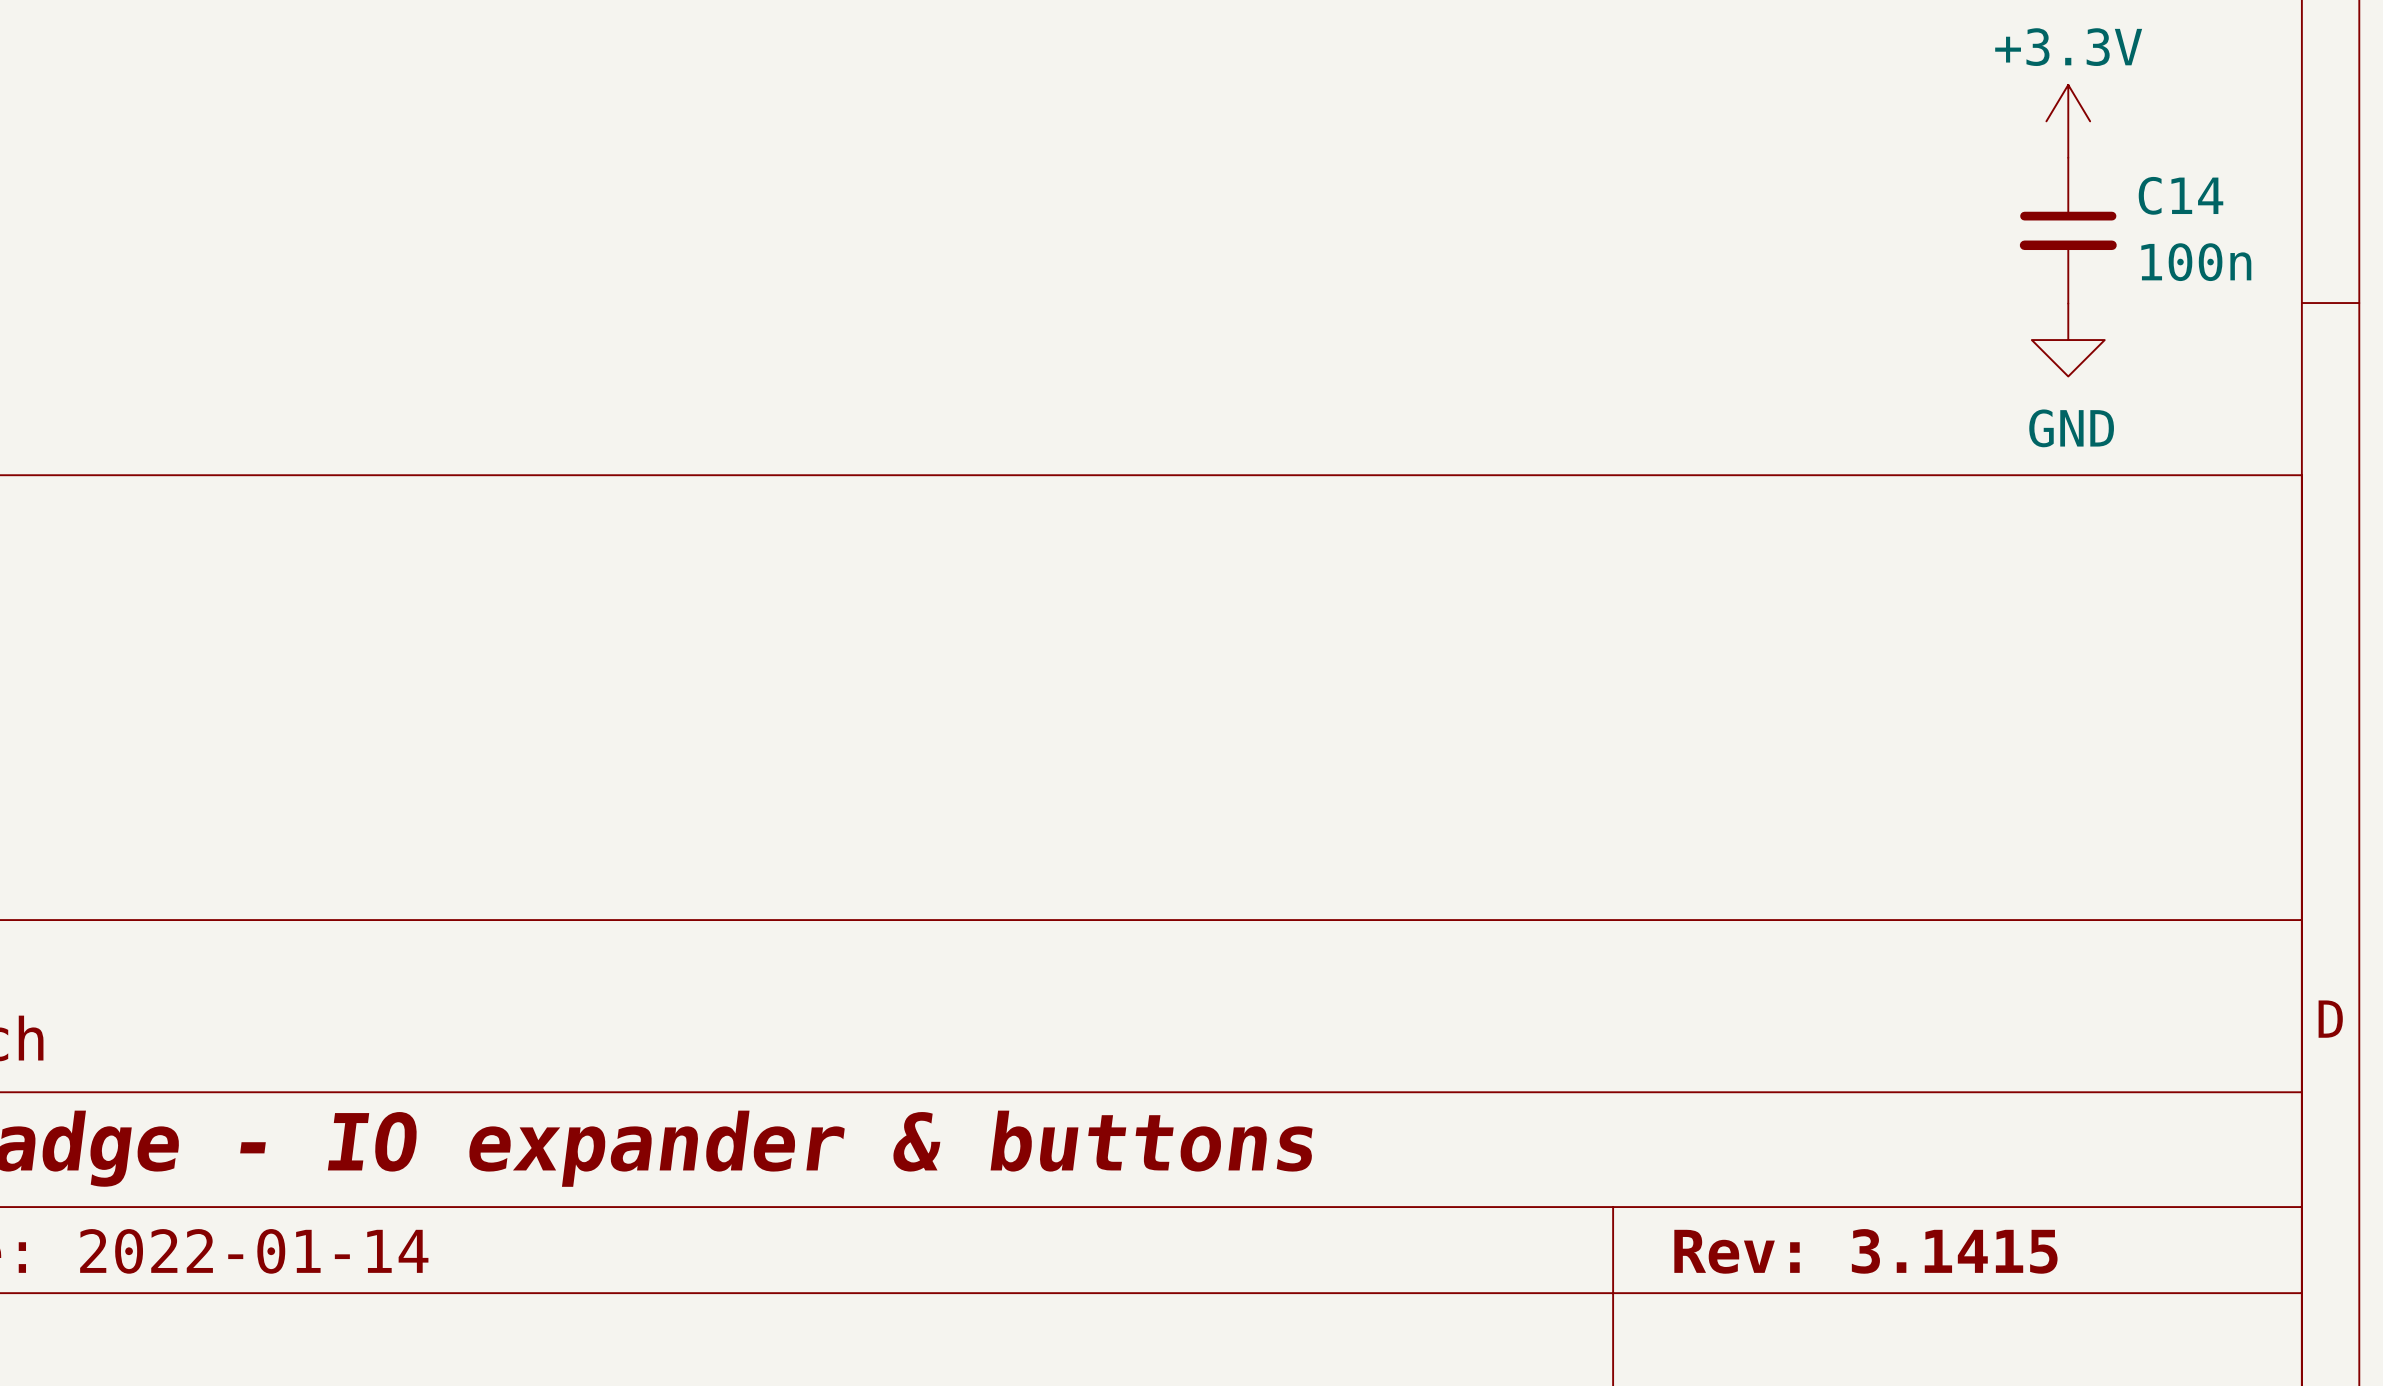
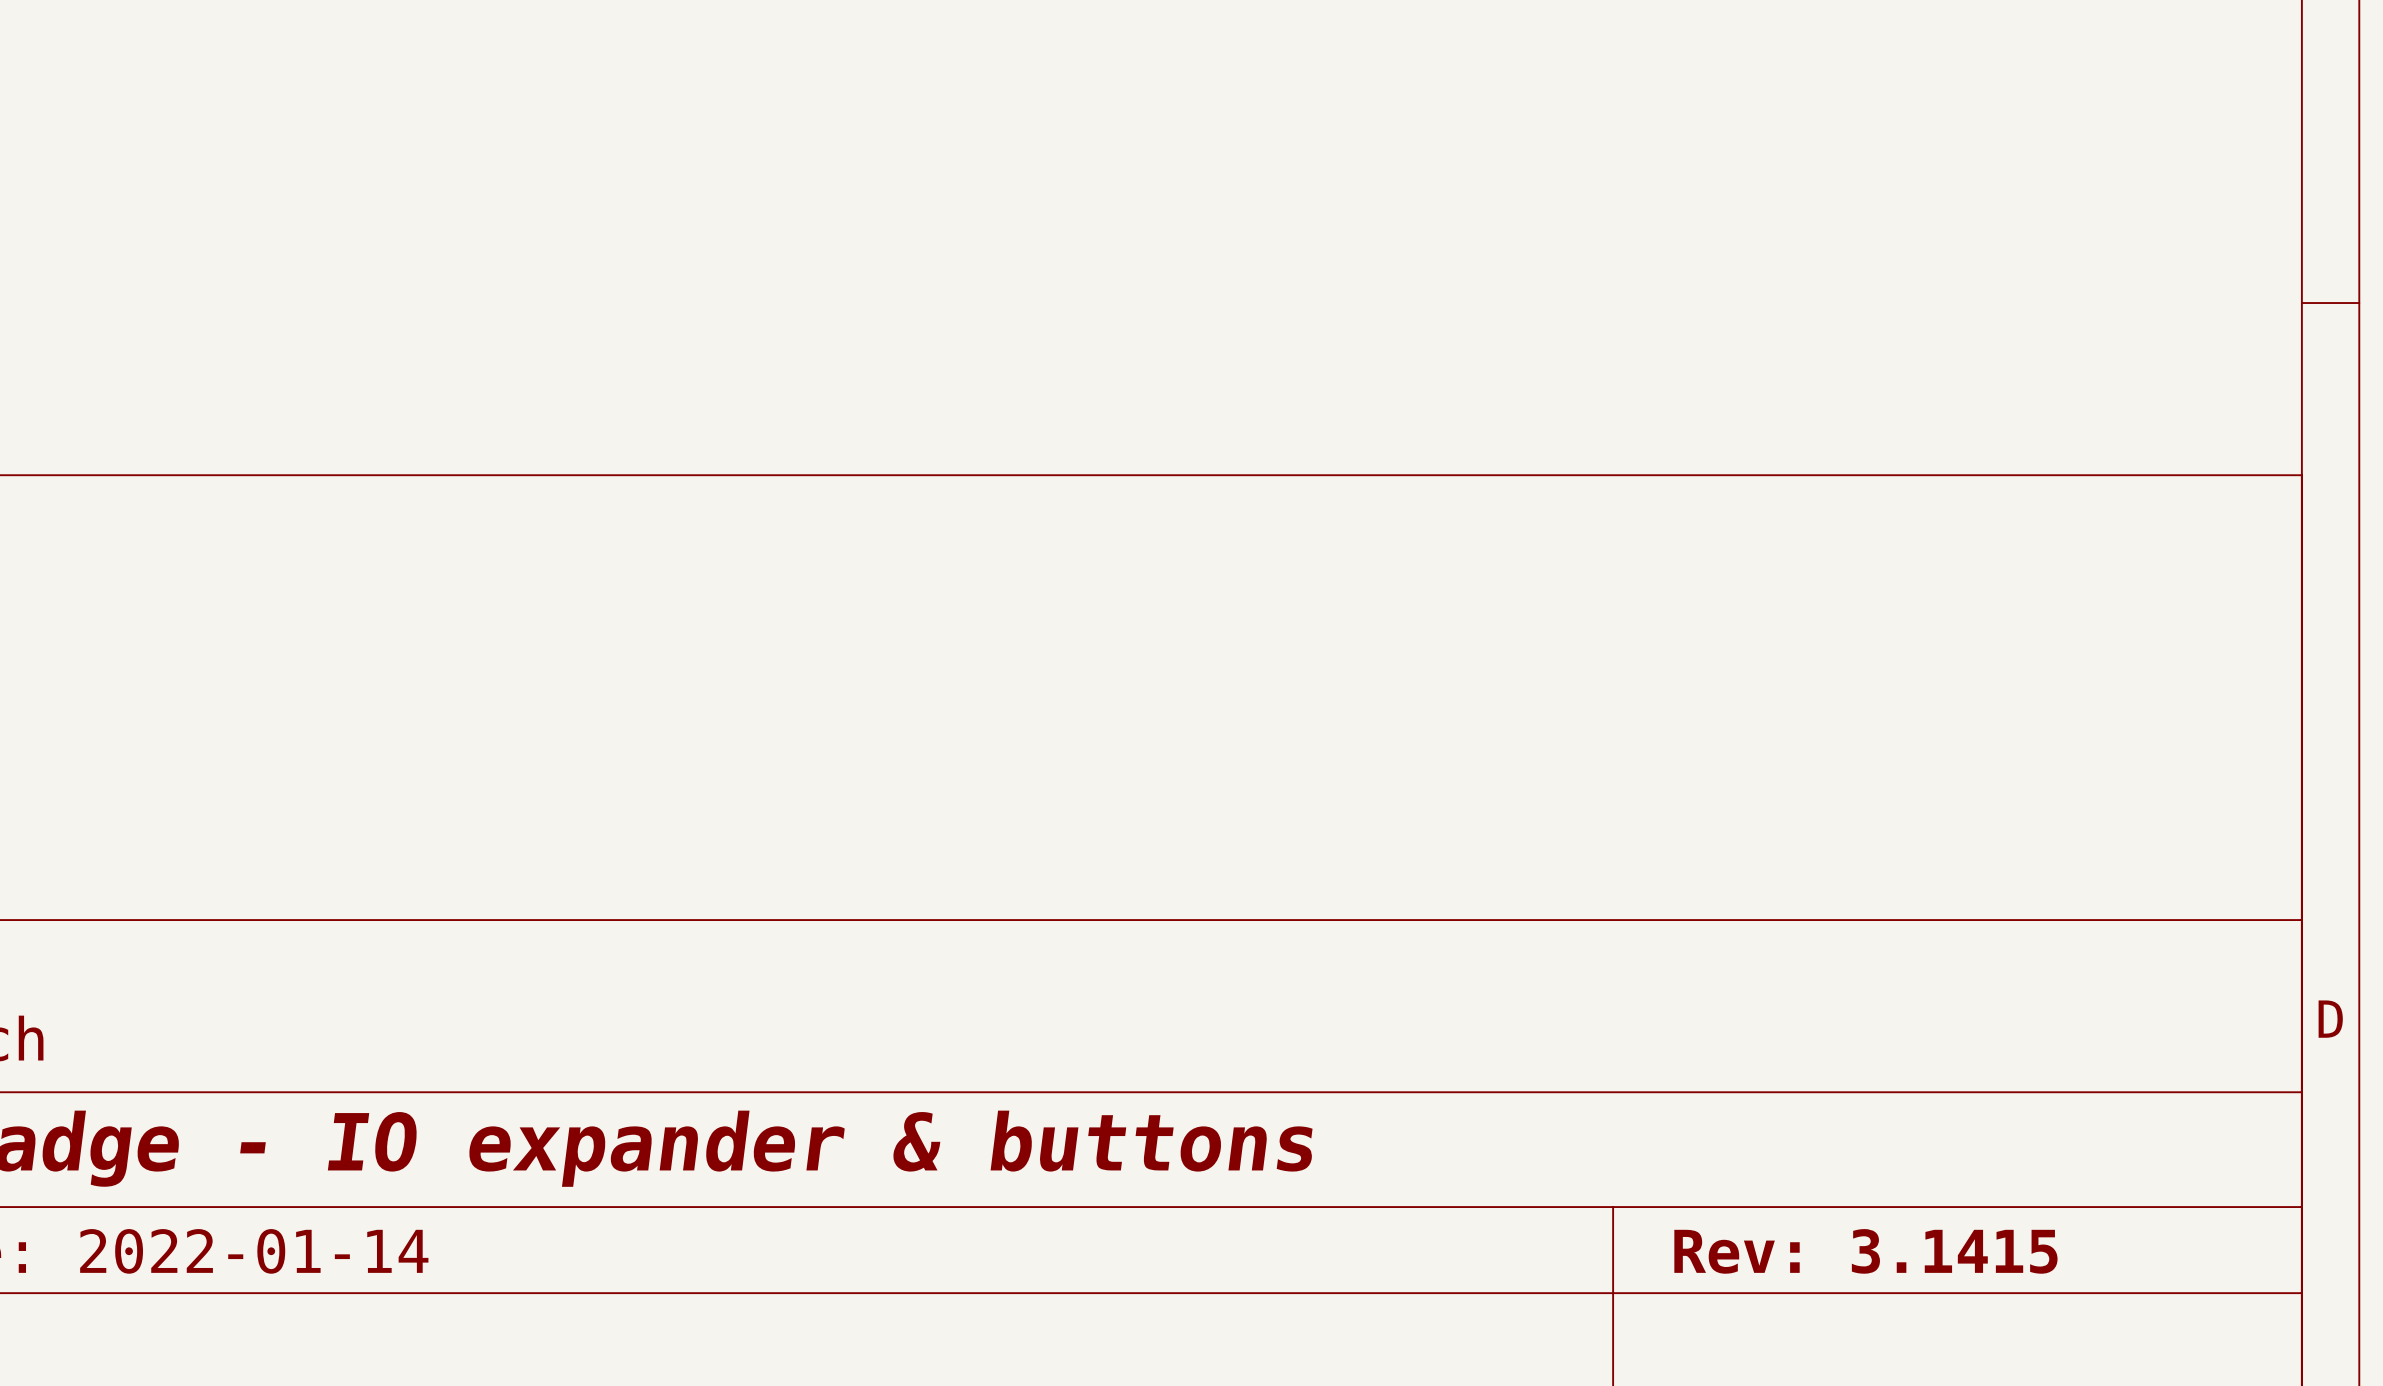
power symbol: +3.3V (2068, 121) -> none
C14: 100n (2068, 230) -> none
power symbol: GND (2068, 340) -> none

